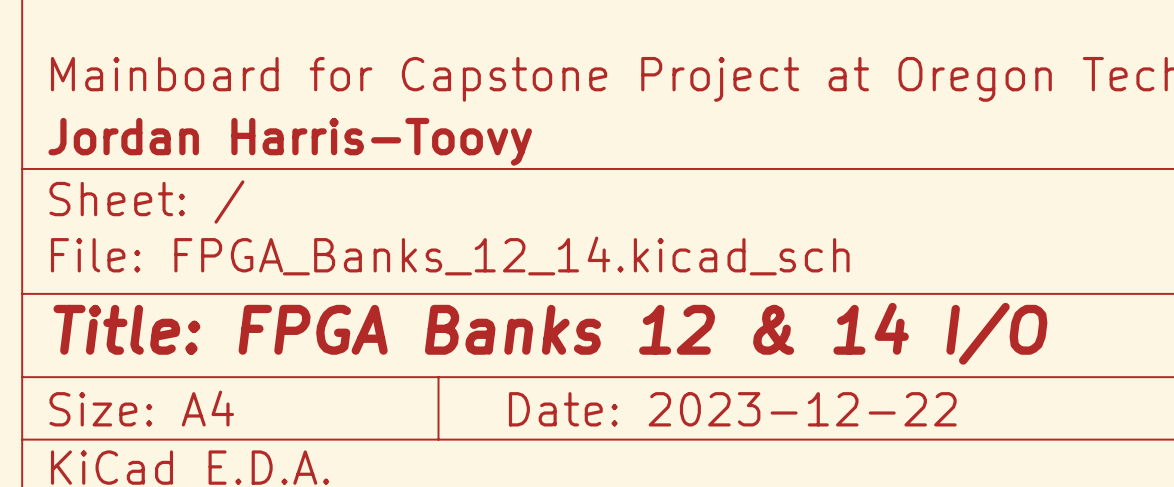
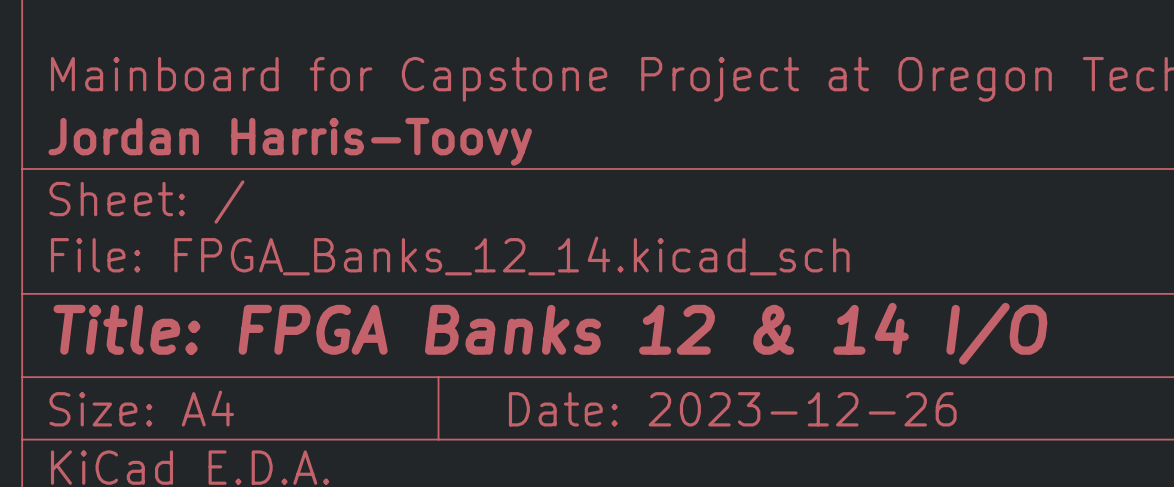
title block: Date: 2023-12-22 (732, 409) -> Date: 2023-12-26 (732, 409)

